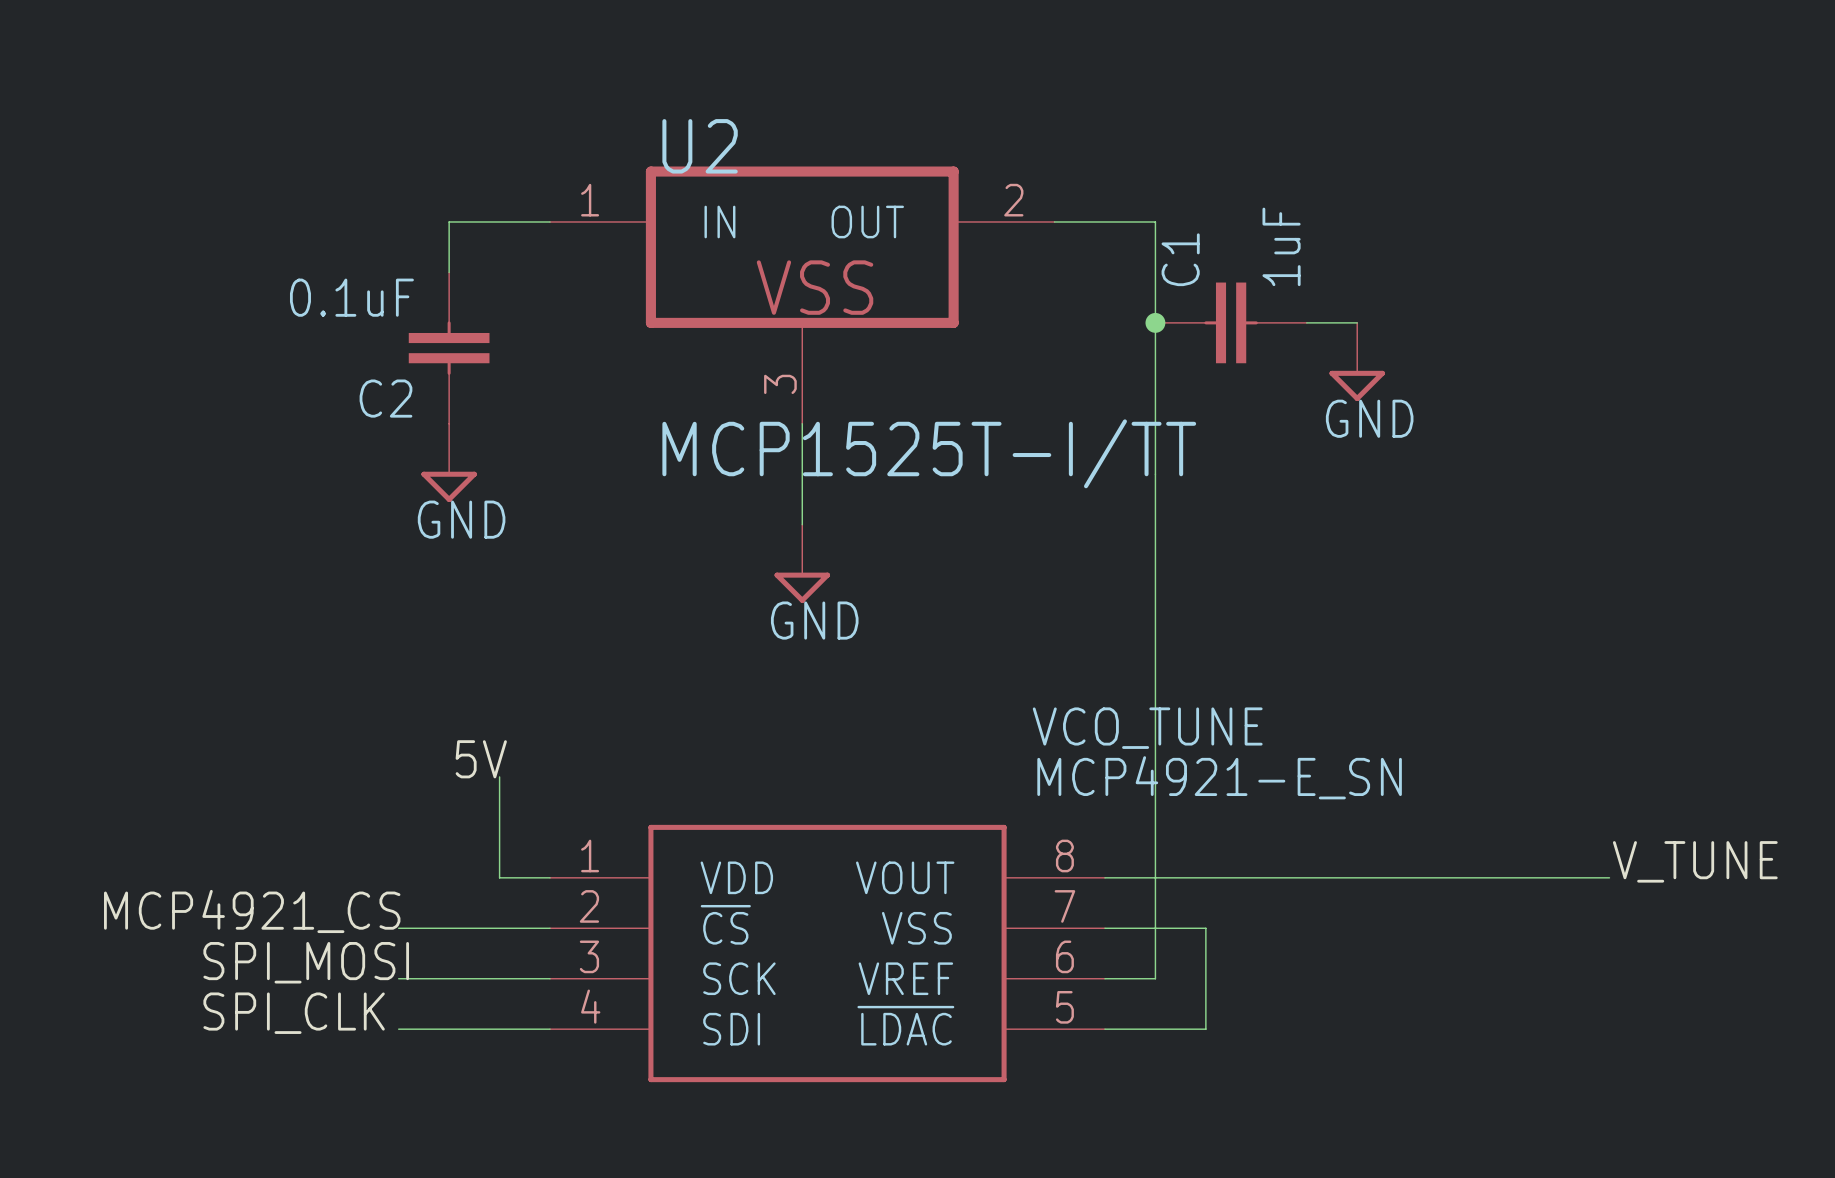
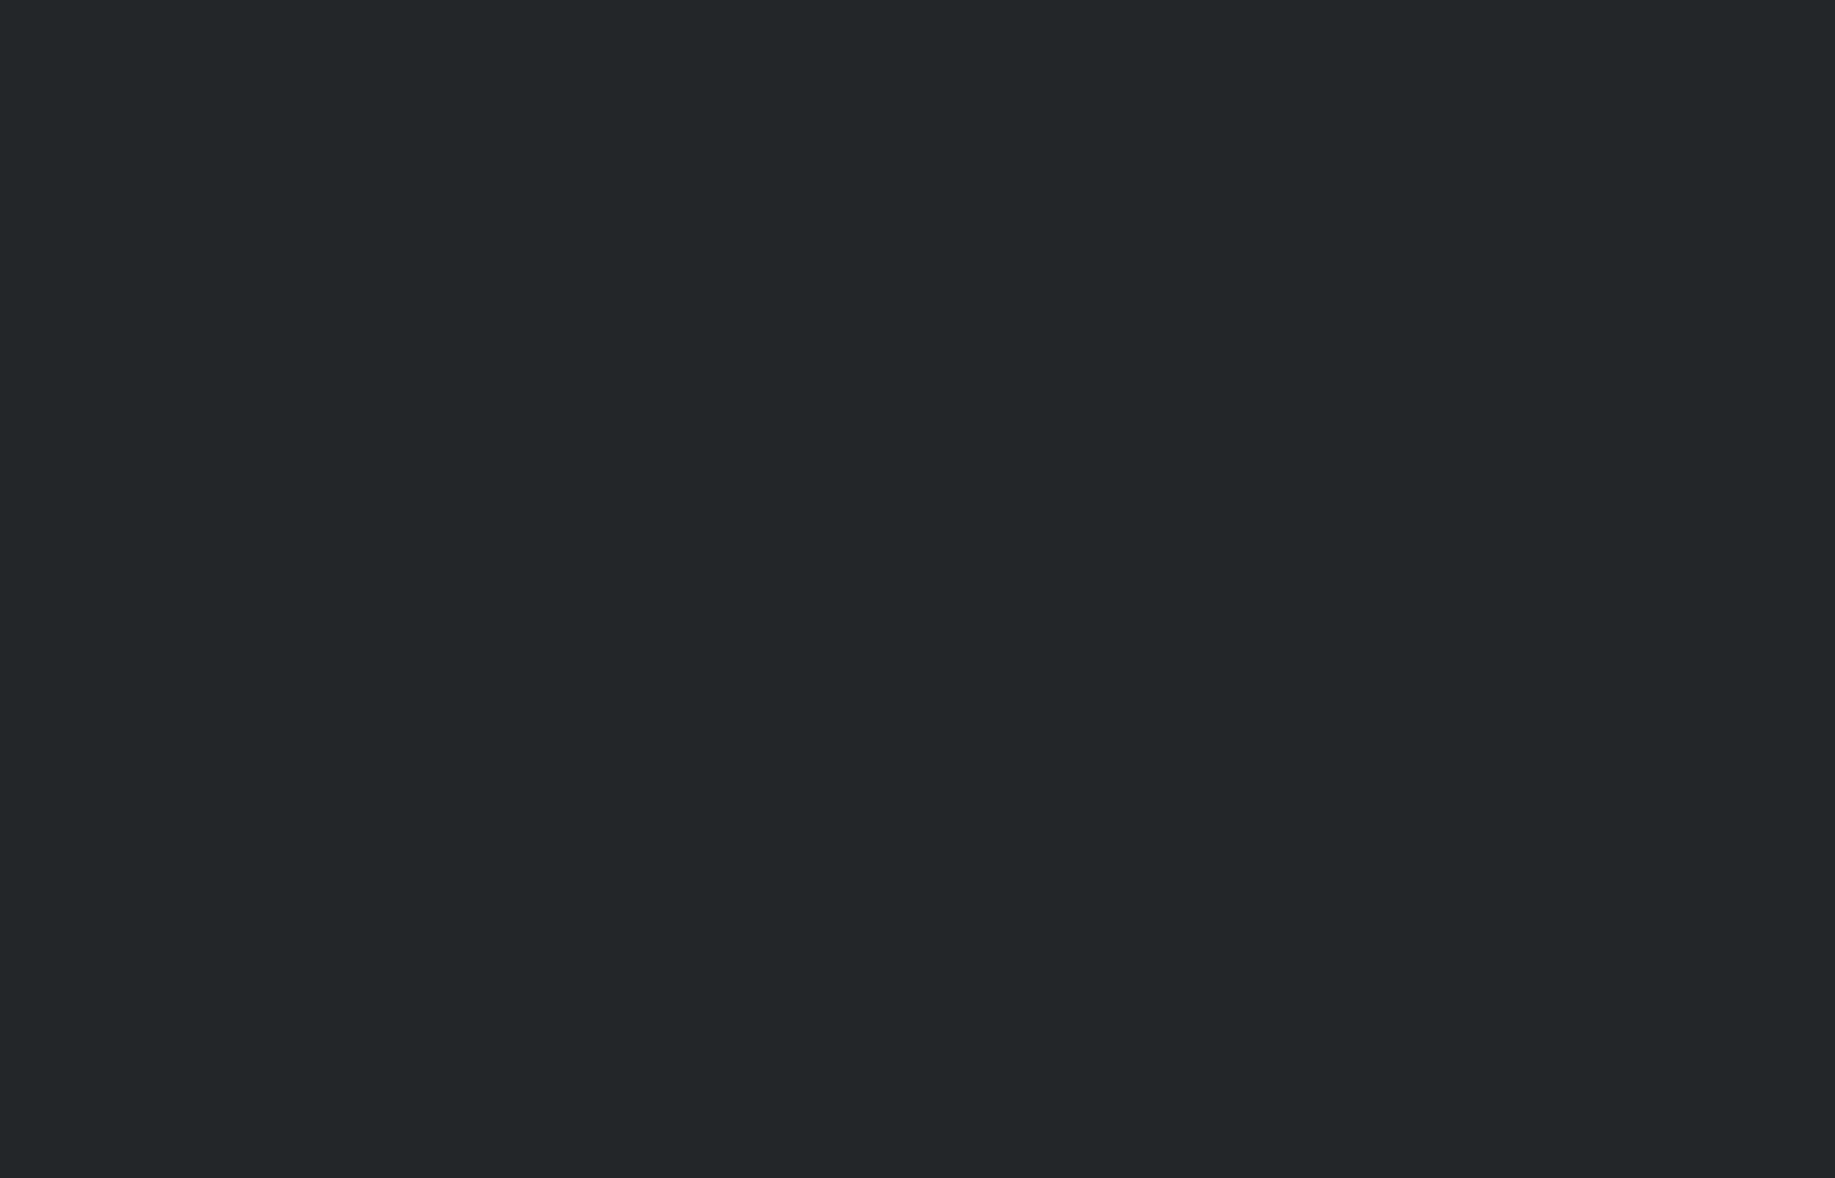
wire: (550, 221) (449, 221) (449, 272) -> none
wire: (1054, 221) (1155, 221) (1155, 978) (1104, 978) -> none
U2: (802, 295) -> none
junction: (1155, 322) -> none
C1: 1uF (1231, 322) -> none
wire: (1306, 322) (1357, 322) -> none
C2: 0.1uF (449, 348) -> none
power symbol: GND (1357, 361) -> none
wire: (802, 423) (802, 524) -> none
power symbol: GND (449, 462) -> none
power symbol: GND (802, 563) -> none
label: 5V (481, 759) -> none
wire: (499, 776) (499, 877) (550, 877) -> none
label: V_TUNE (1695, 861) -> none
wire: (1104, 877) (1609, 877) -> none
label: MCP4921_CS (252, 911) -> none
wire: (398, 928) (550, 928) -> none
wire: (1104, 928) (1205, 928) (1205, 1029) (1104, 1029) -> none
VCO_TUNE: MCP4921-E_SN (827, 953) -> none
label: SPI_MOSI (306, 962) -> none
wire: (398, 978) (550, 978) -> none
label: SPI_CLK (294, 1013) -> none
wire: (398, 1029) (550, 1029) -> none

